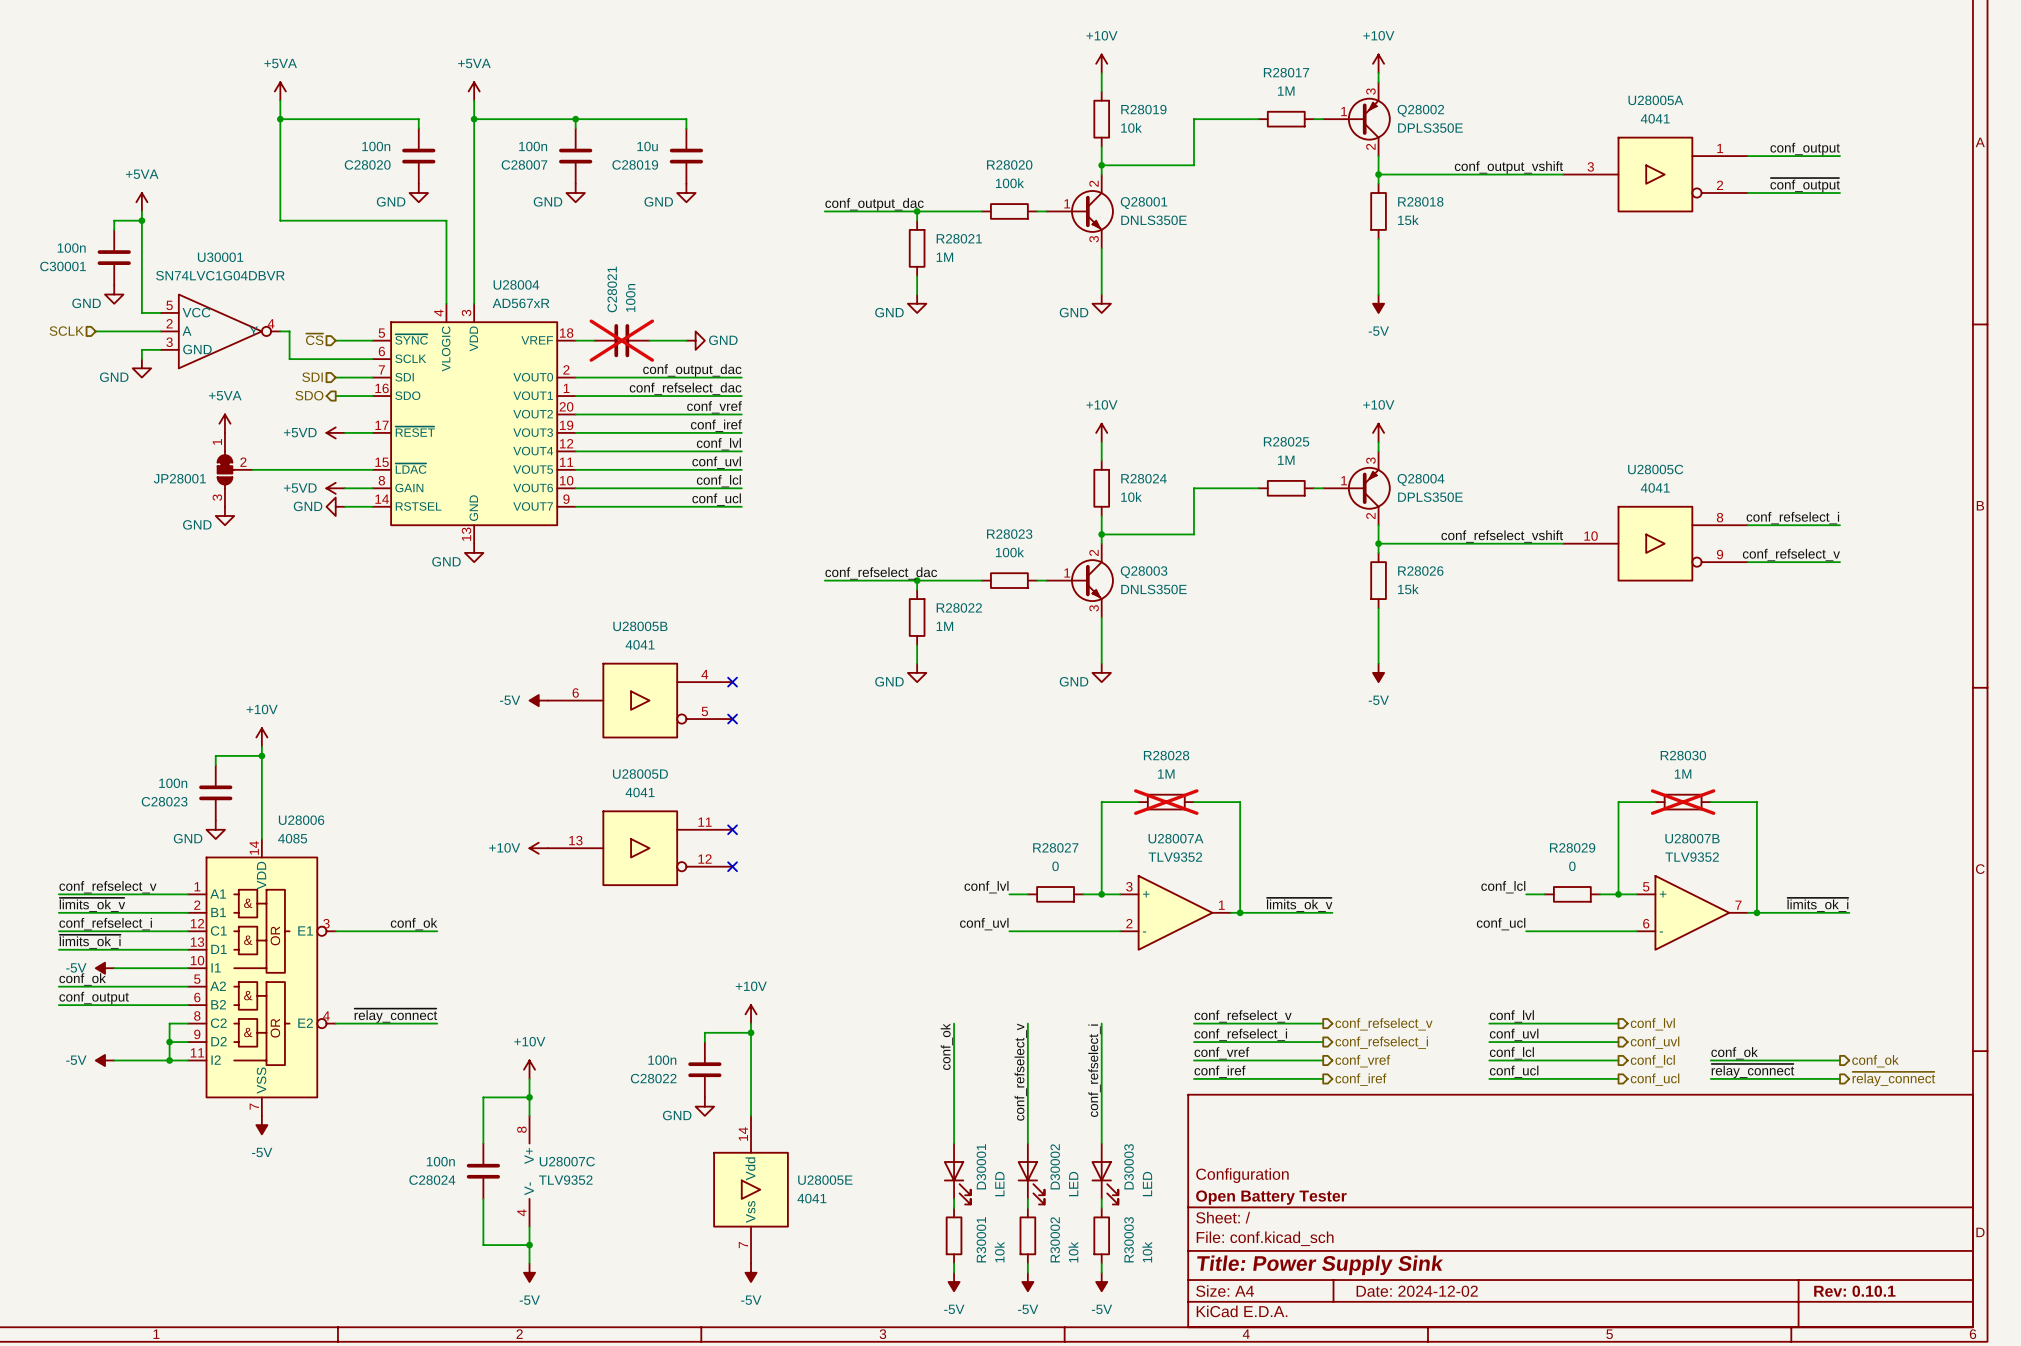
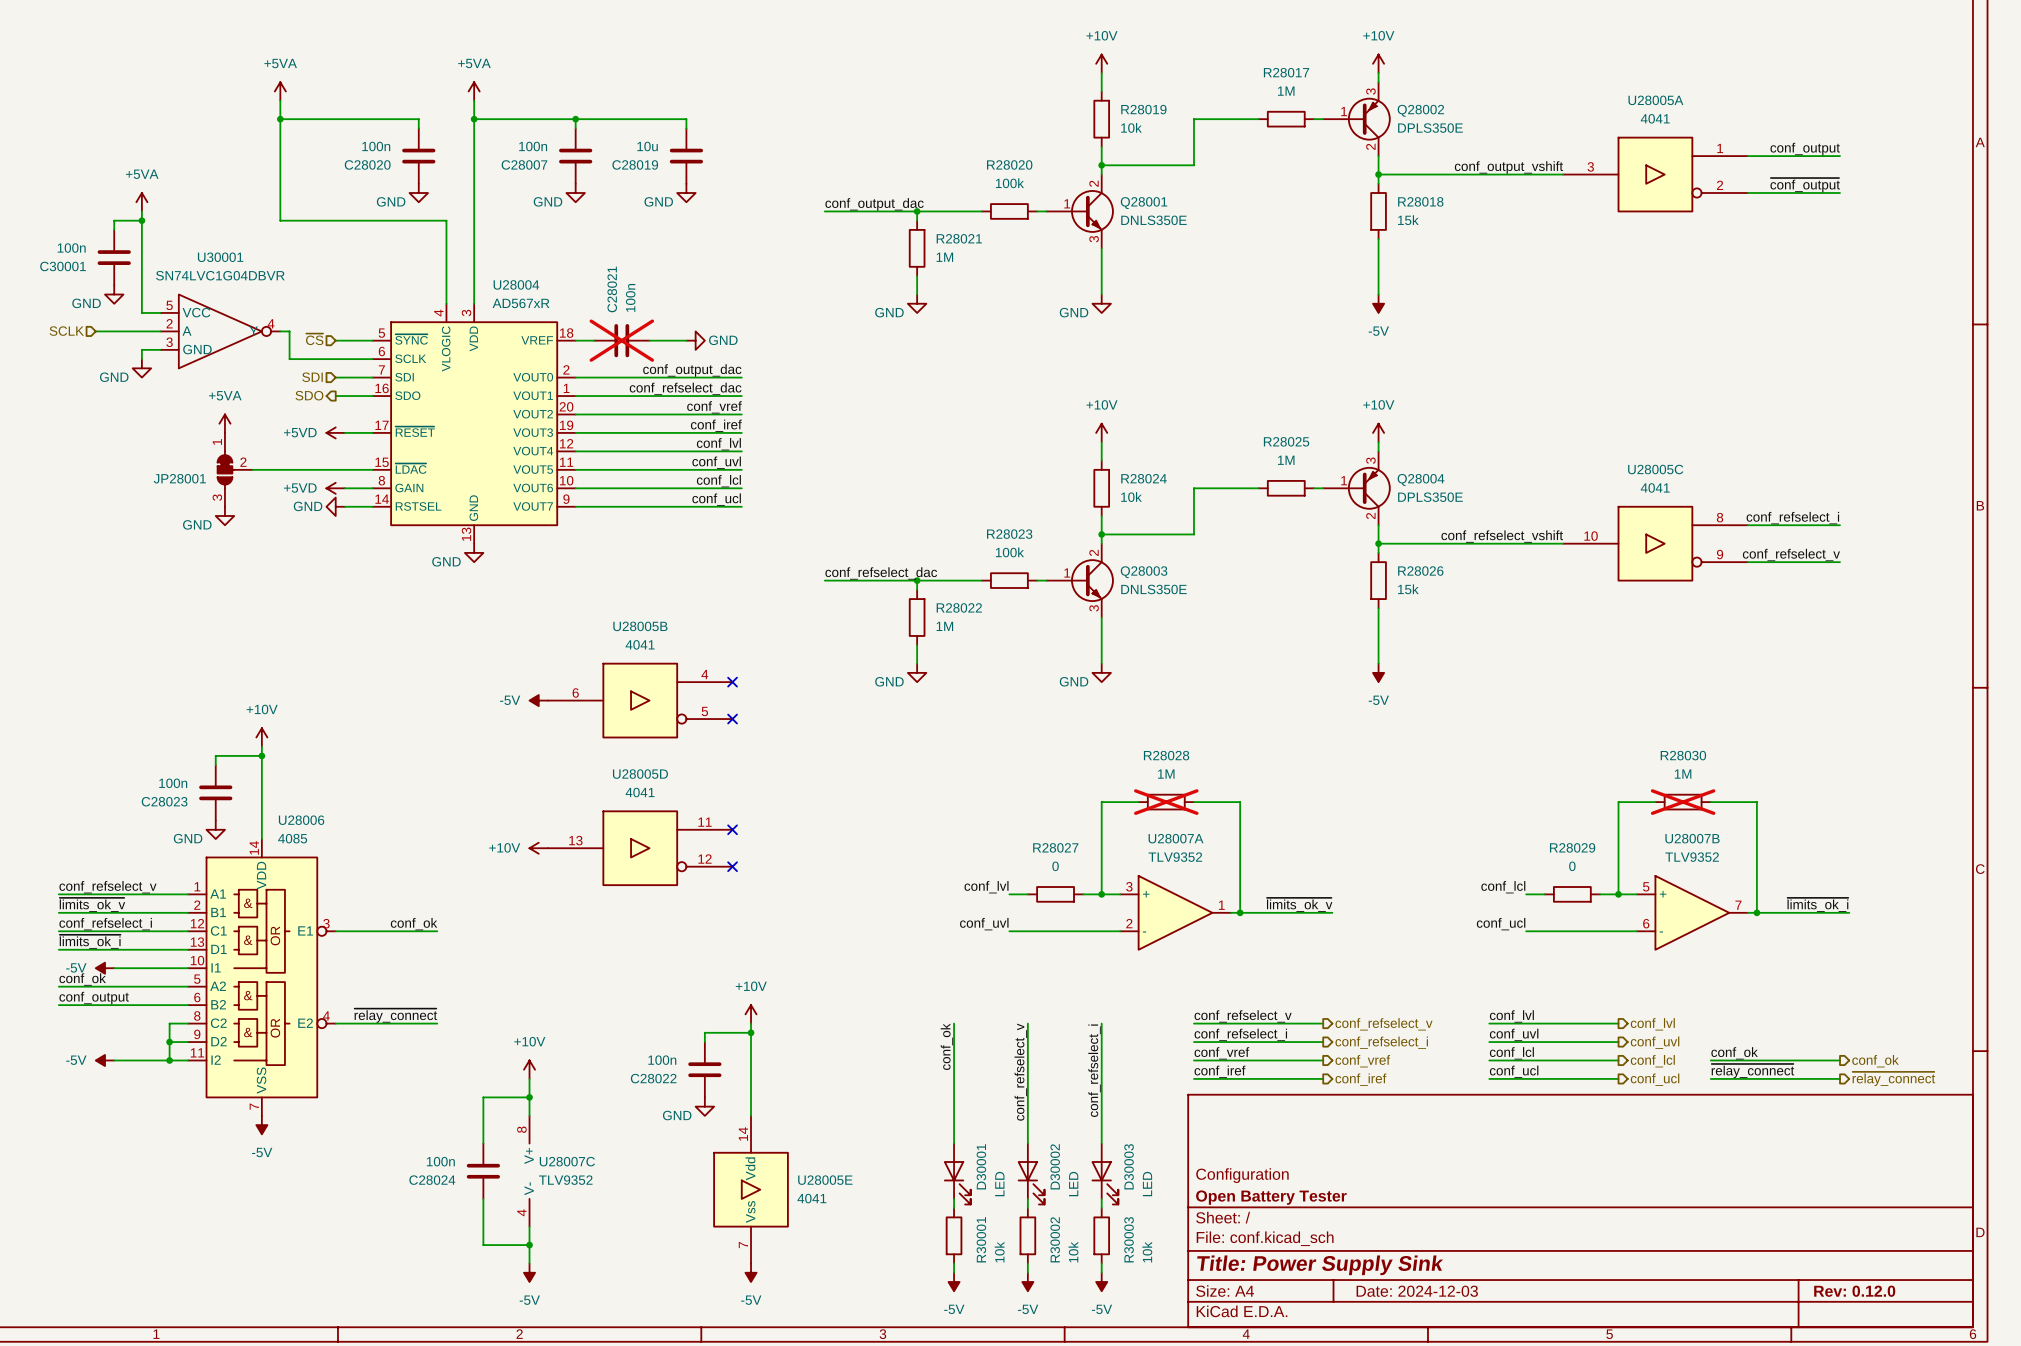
title block: Date: 2024-12-02 (1417, 1291) -> Date: 2024-12-03 (1417, 1291)
title block: Rev: 0.10.1 (1854, 1291) -> Rev: 0.12.0 (1854, 1291)

